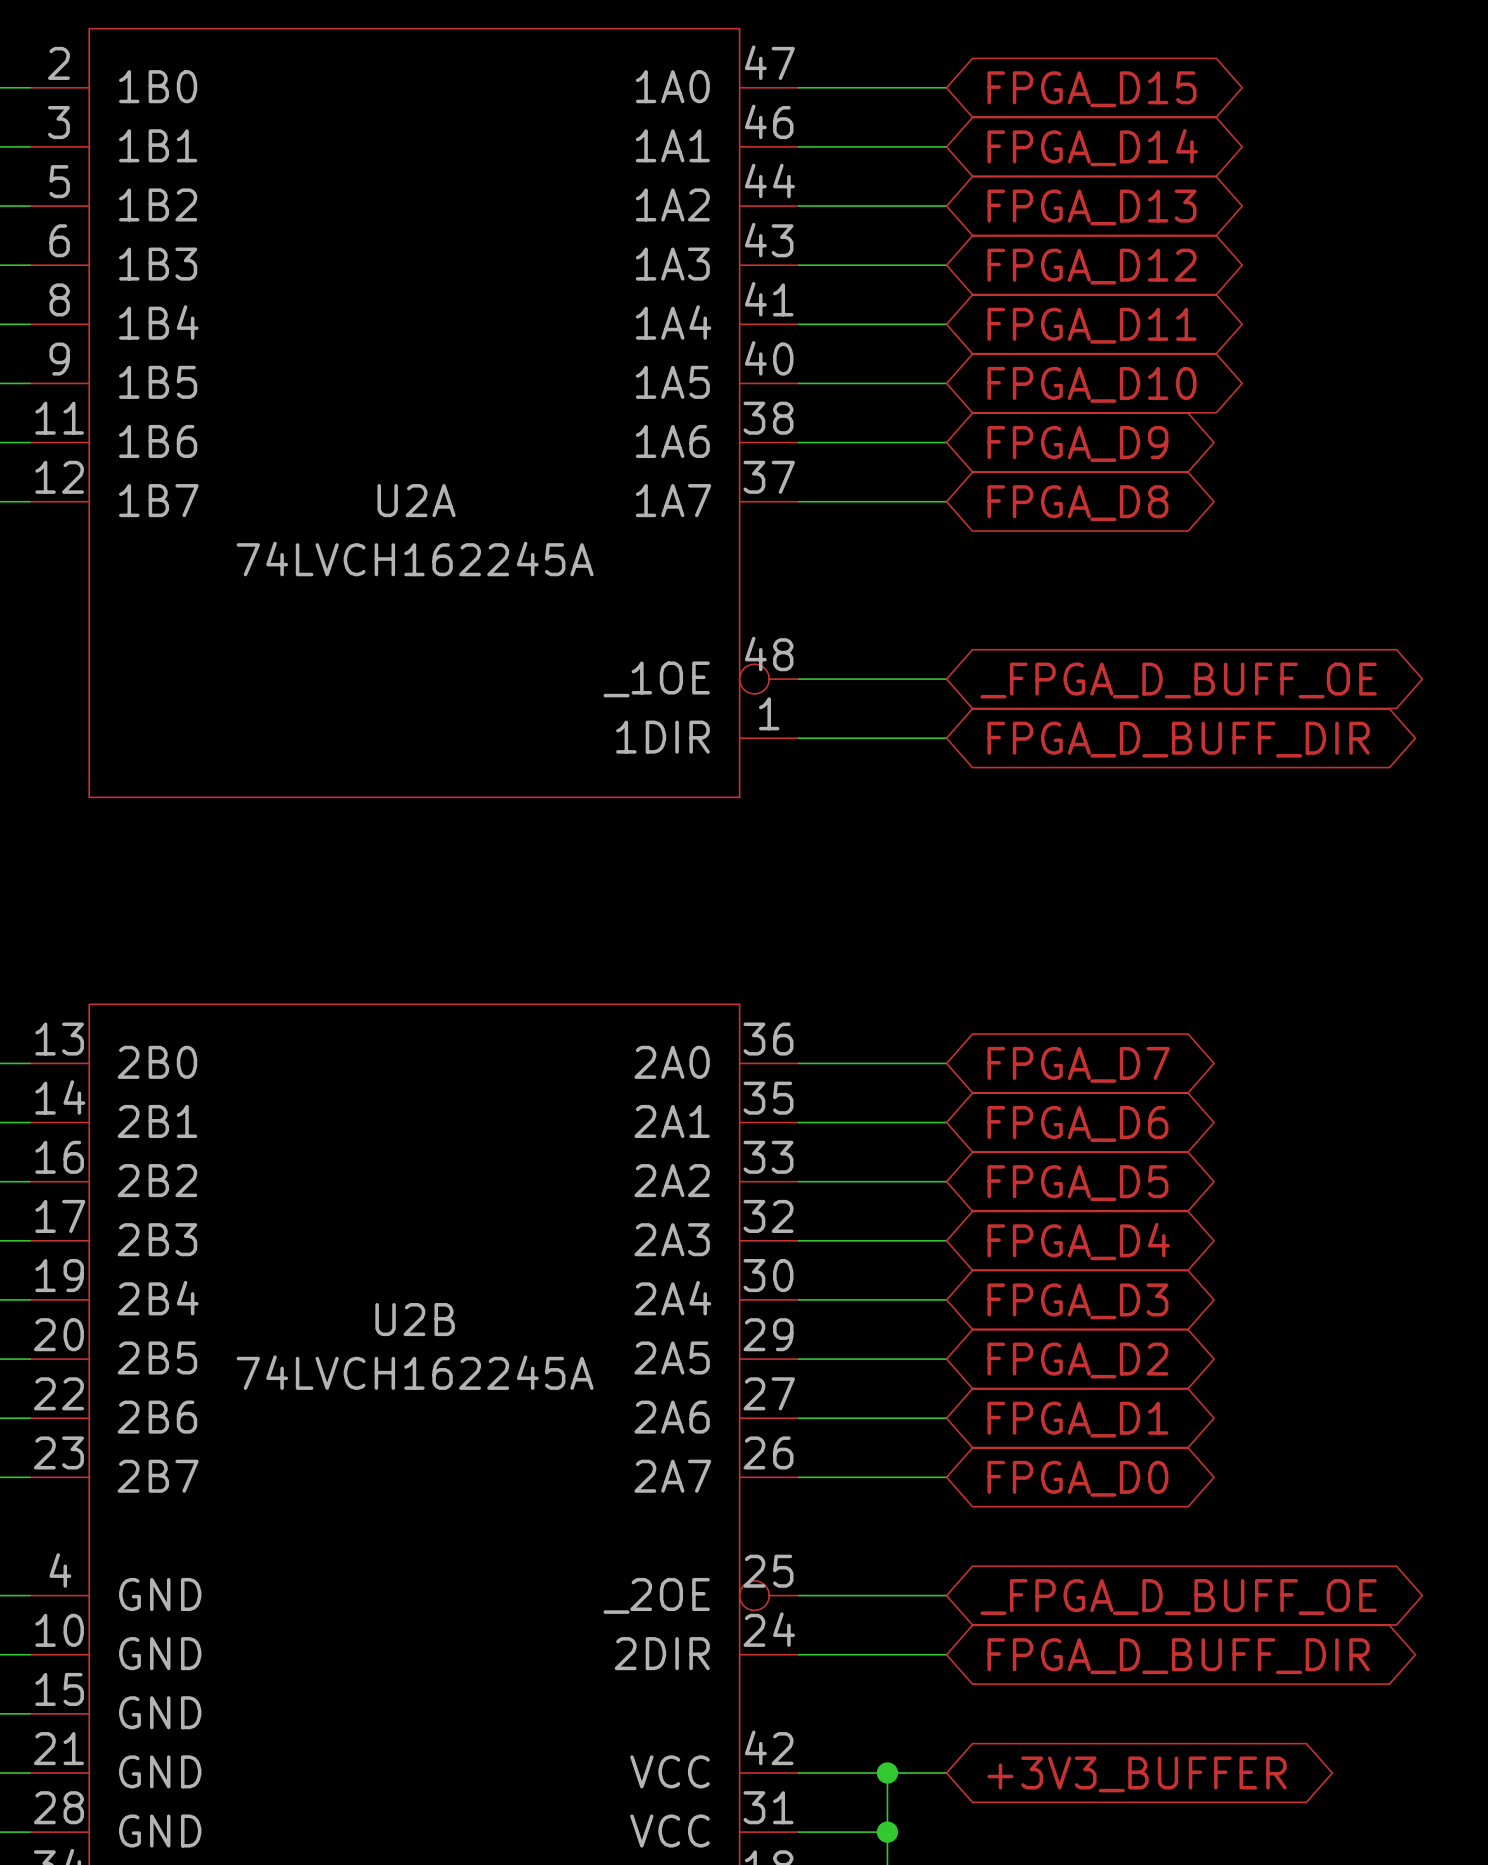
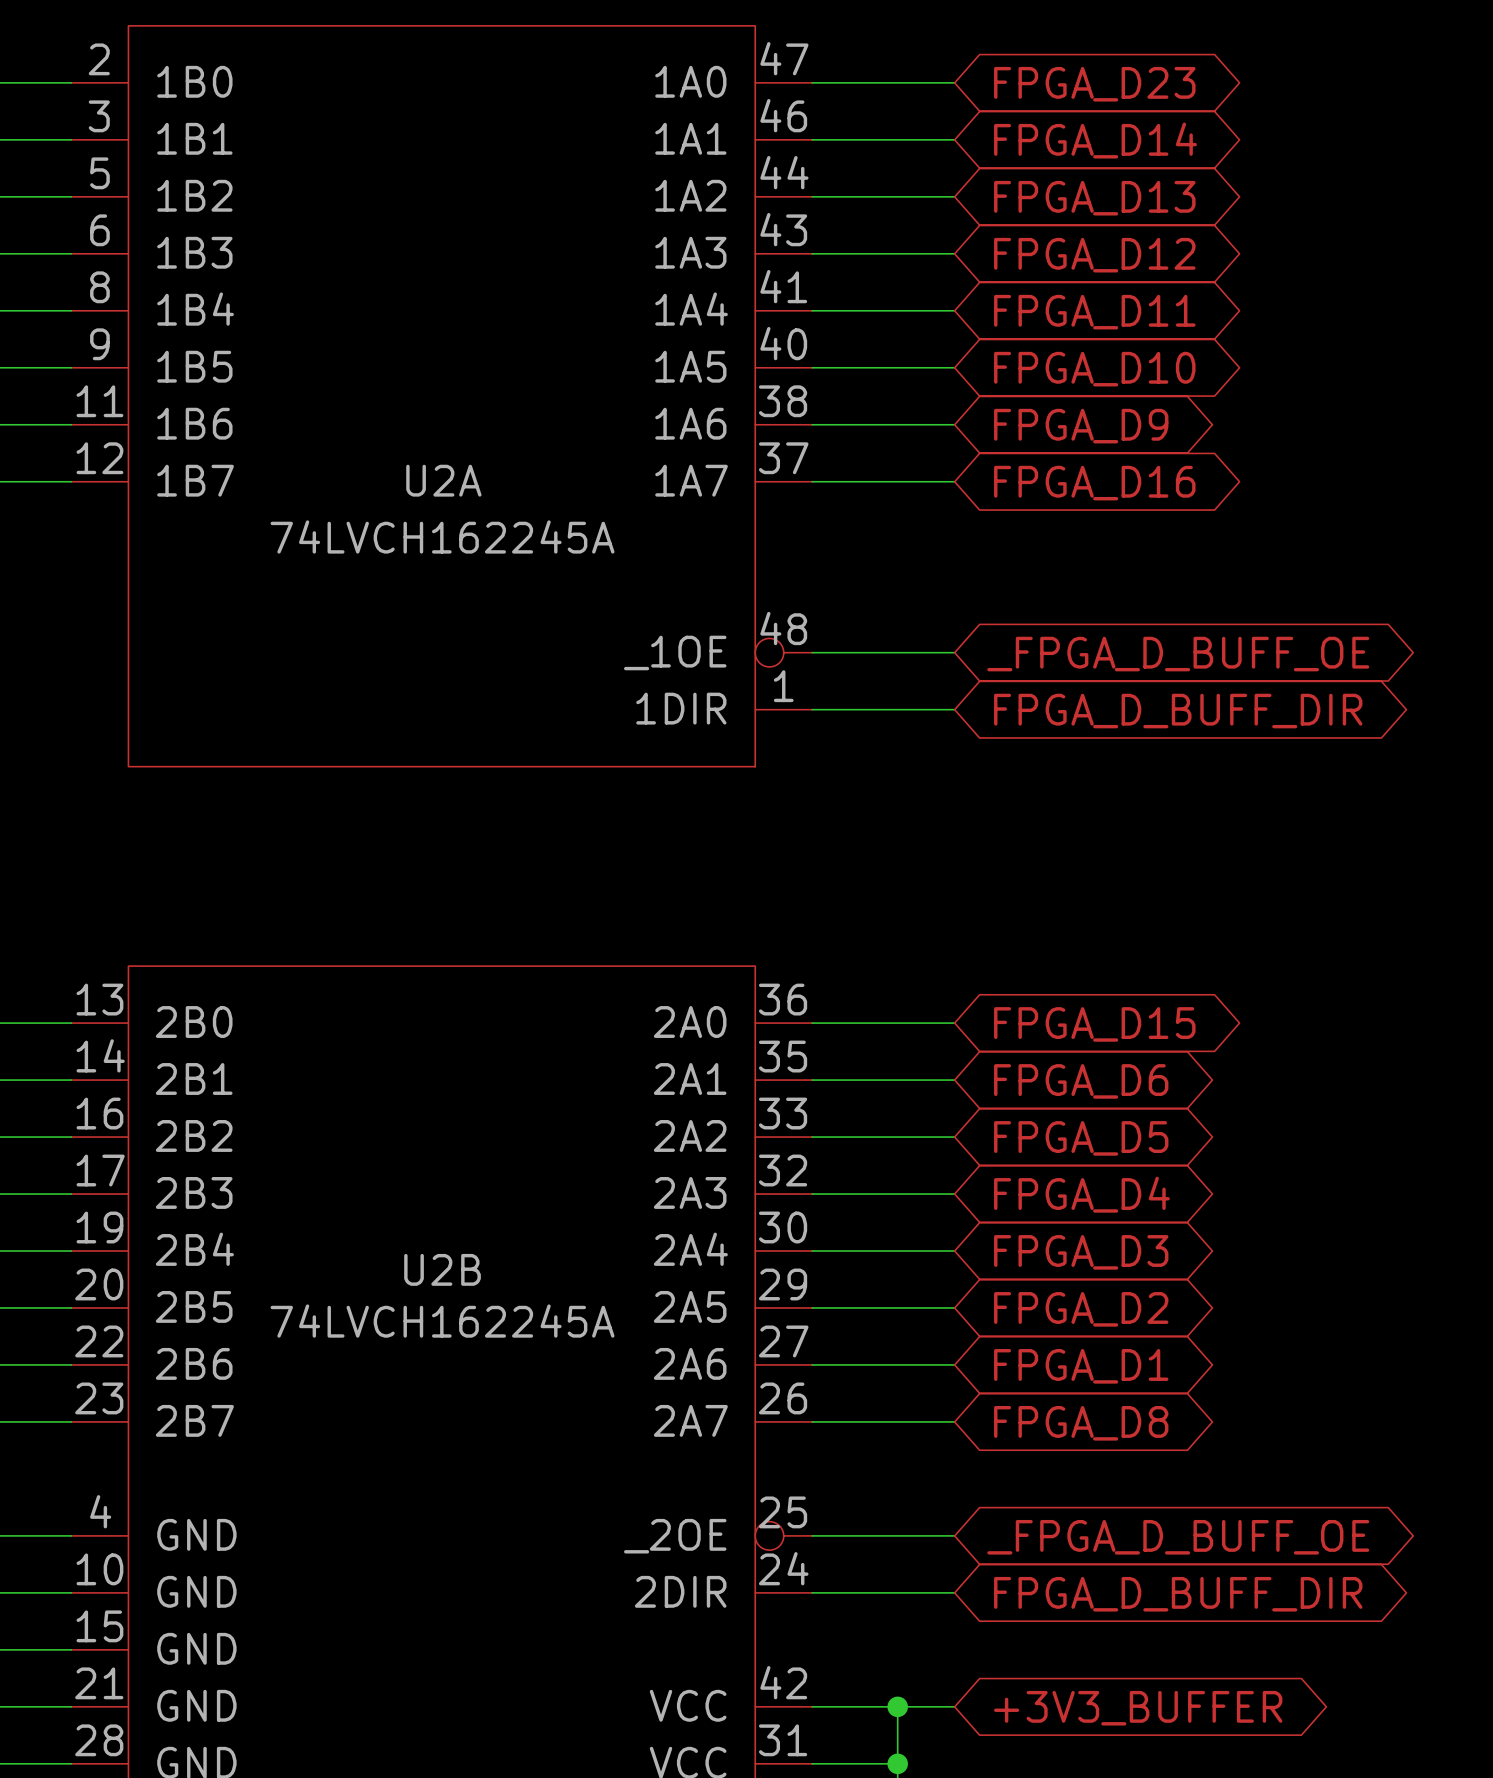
global label: FPGA_D15 (1092, 89) -> FPGA_D23 (1094, 84)
global label: FPGA_D8 (1077, 503) -> FPGA_D16 (1094, 483)
global label: FPGA_D7 (1078, 1064) -> FPGA_D15 (1094, 1024)
global label: FPGA_D0 (1077, 1478) -> FPGA_D8 (1081, 1423)

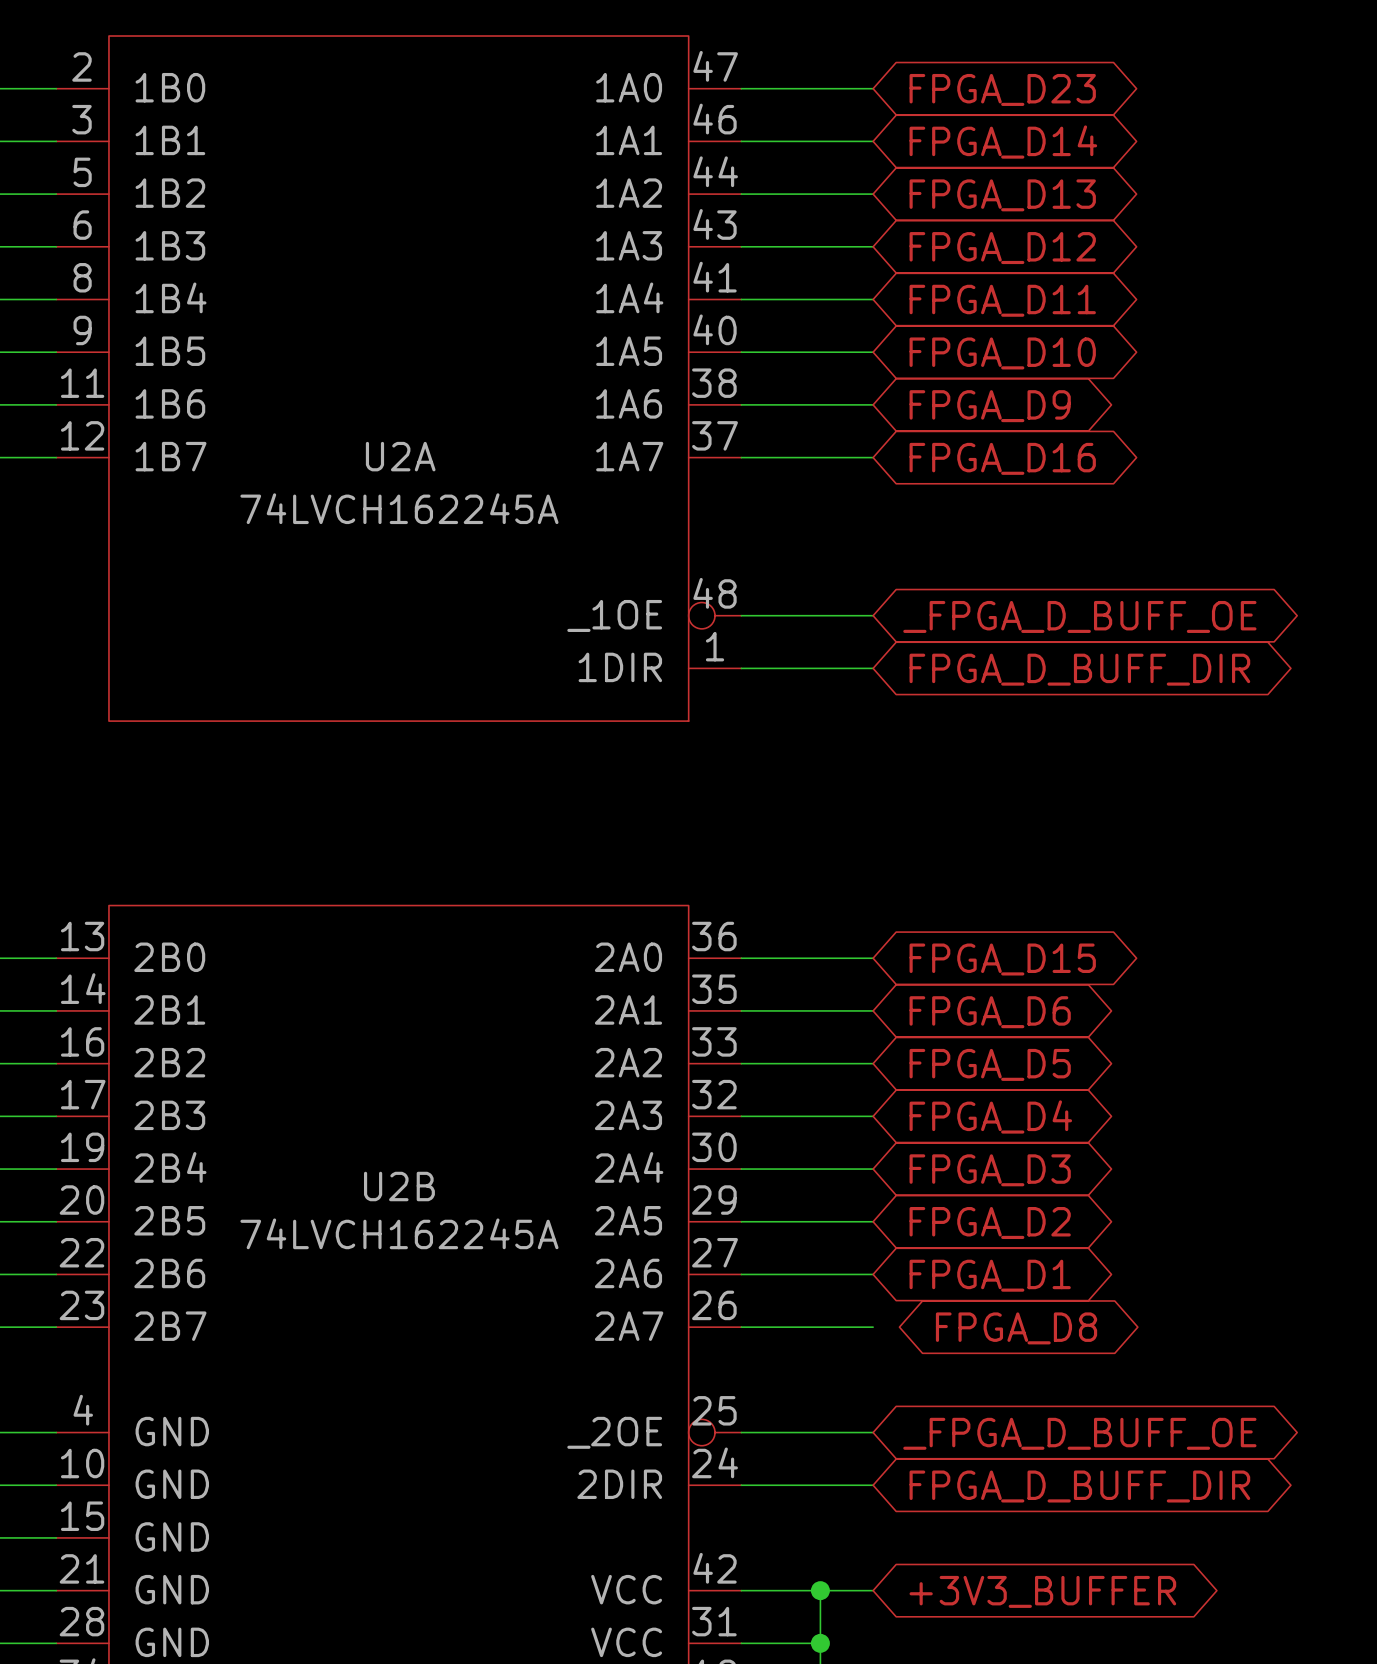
global label position: FPGA_D8 (1081, 1423) -> FPGA_D8 (1016, 1328)

